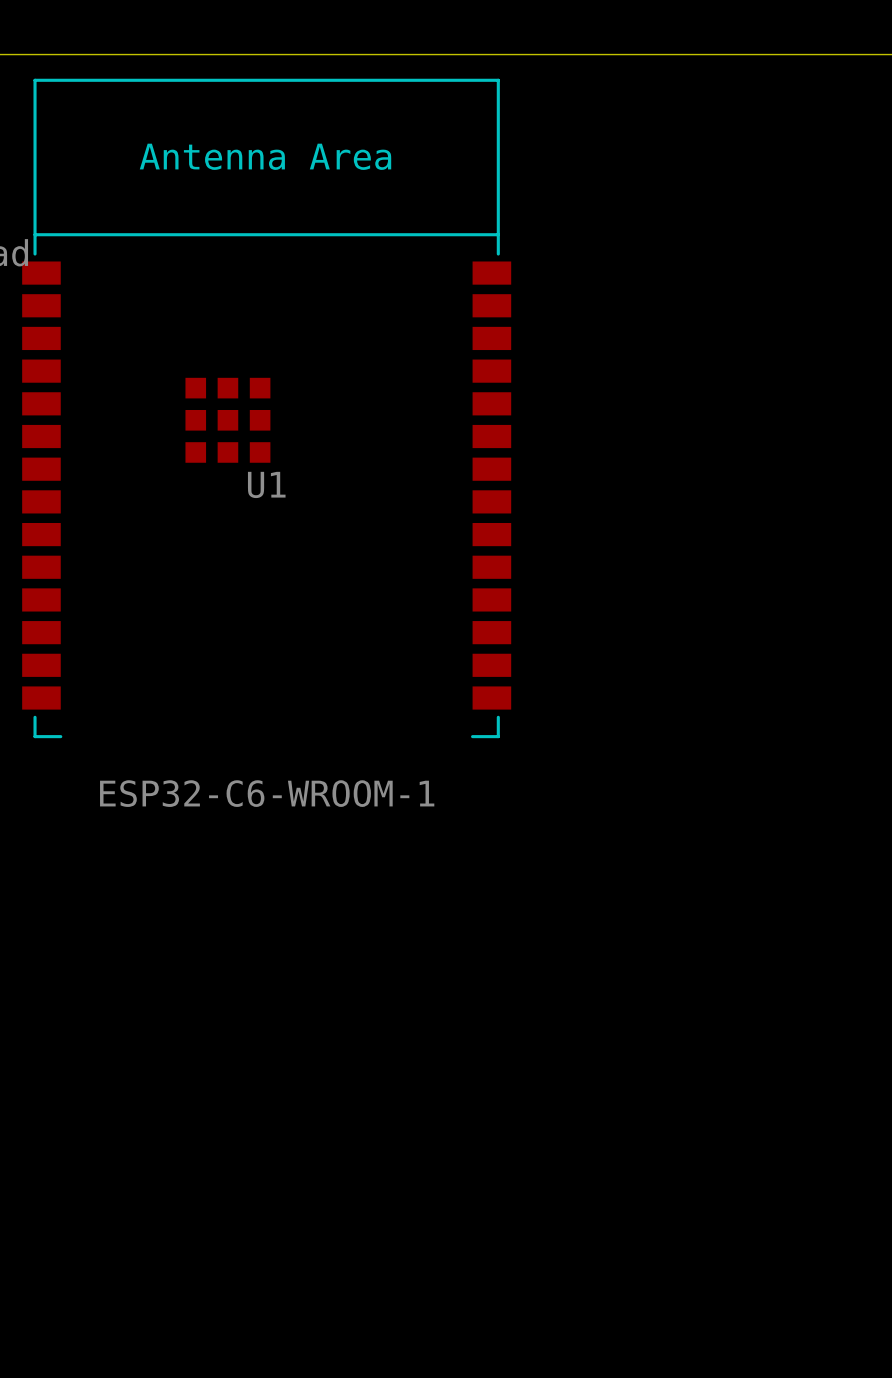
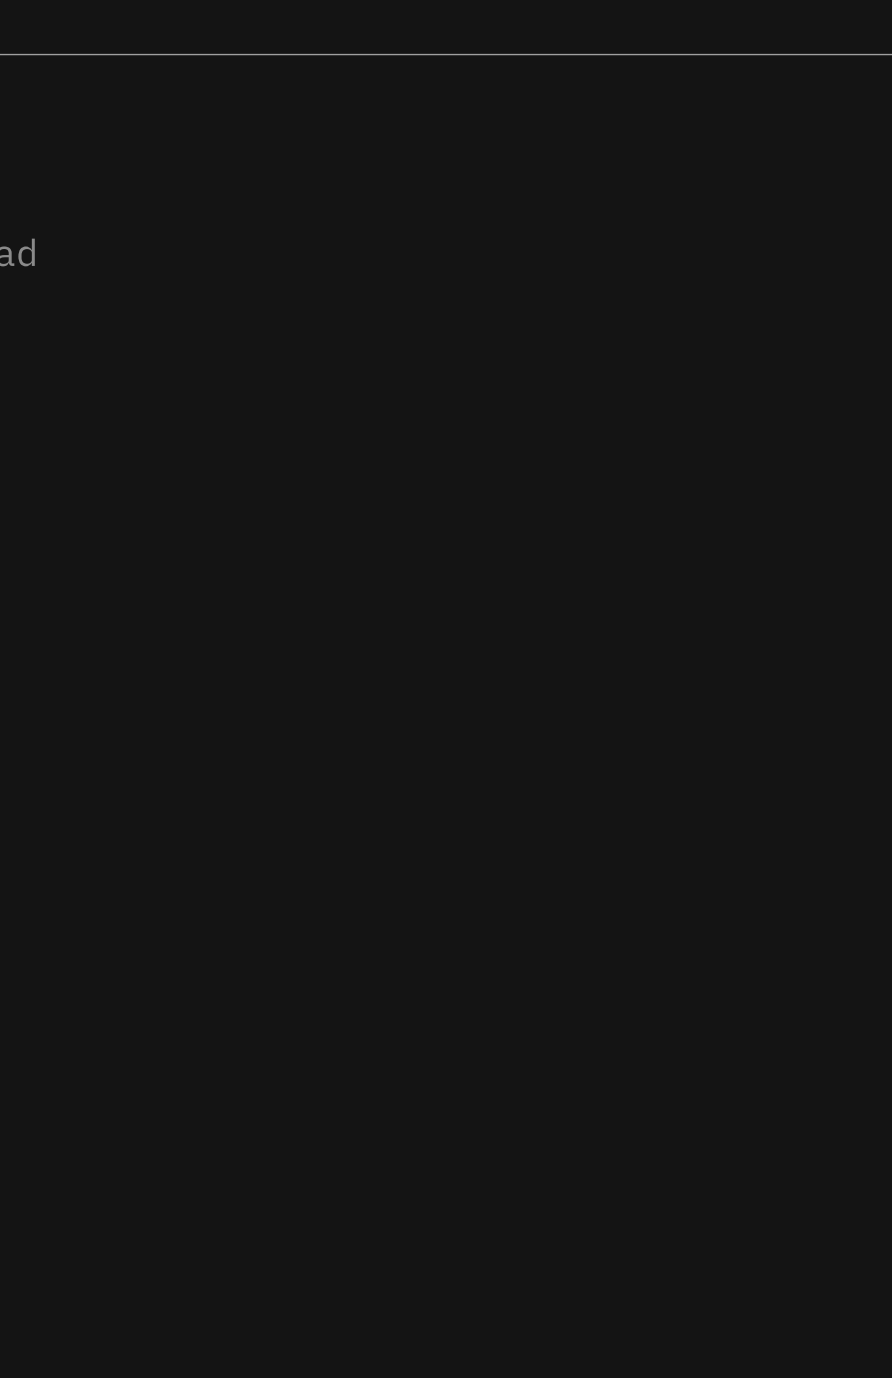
U1: ESP32-C6-WROOM-1 (266, 408) -> none

